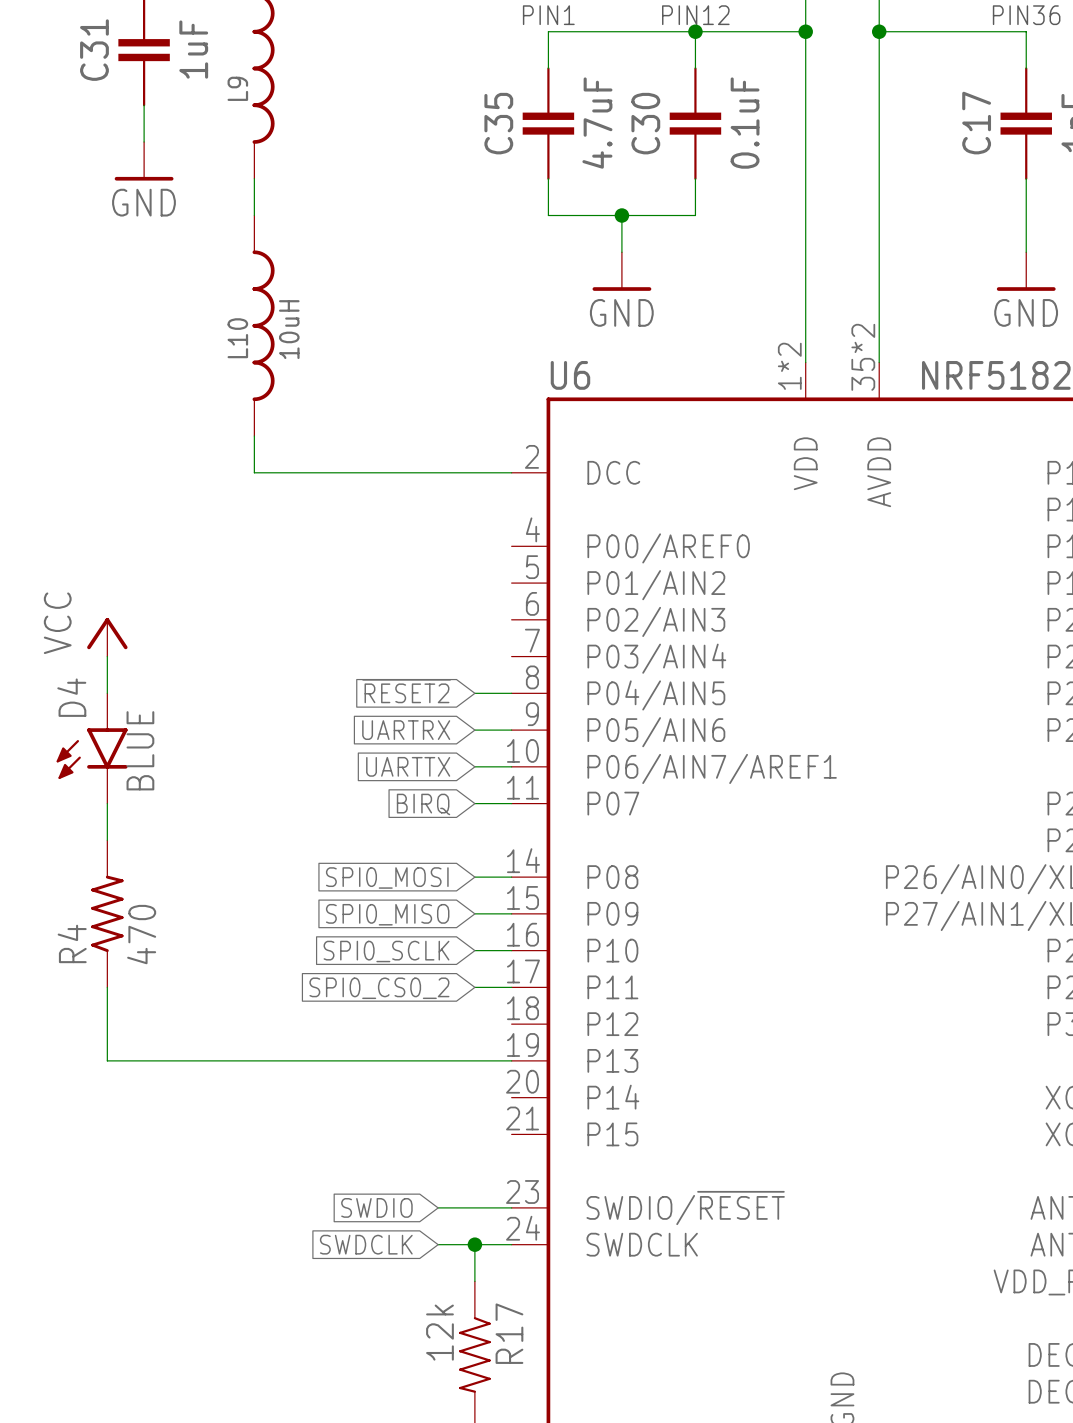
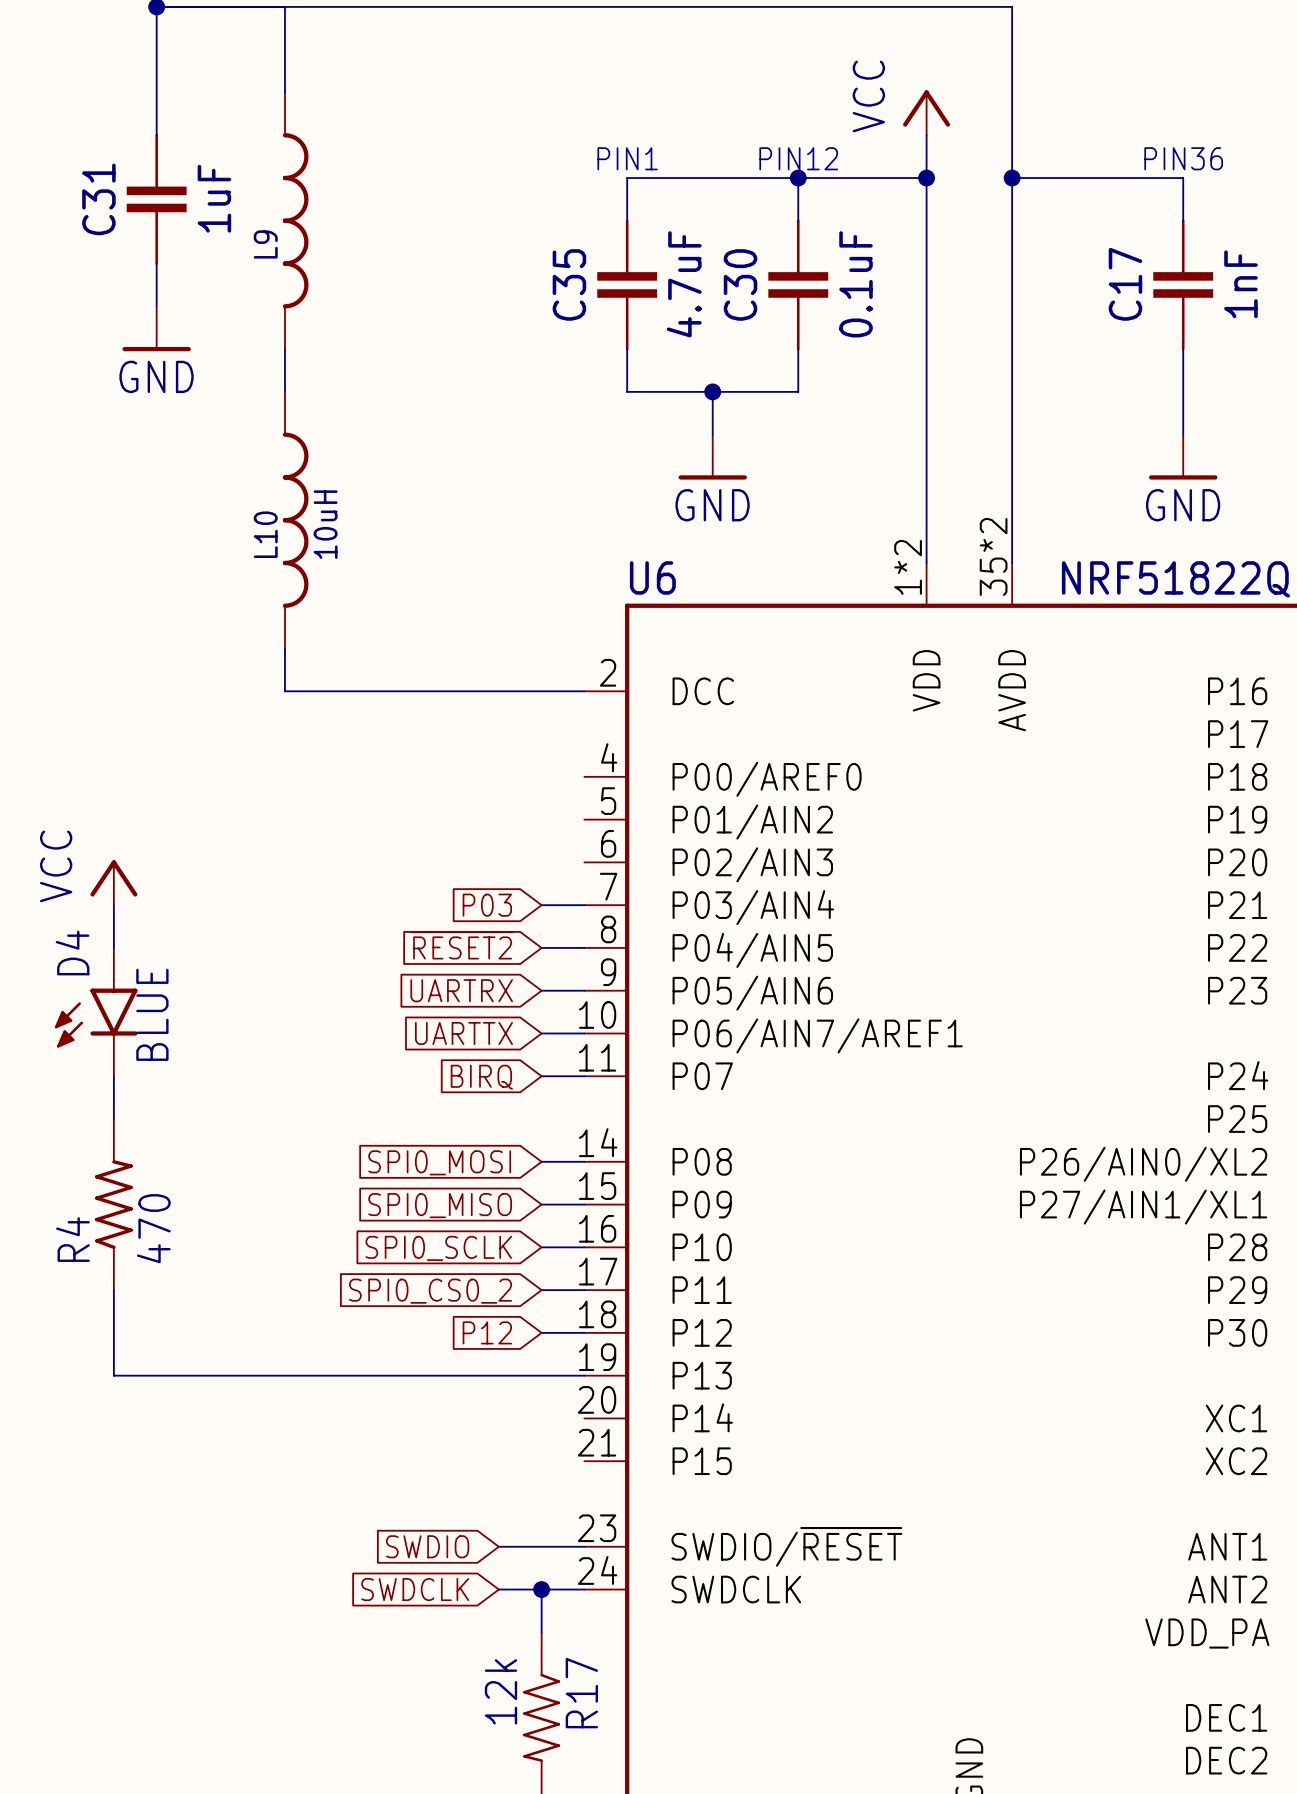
global label: none -> P03 (487, 905)
wire: none -> (541, 905) (584, 905)
global label: none -> P12 (487, 1332)
wire: none -> (541, 1332) (584, 1332)

